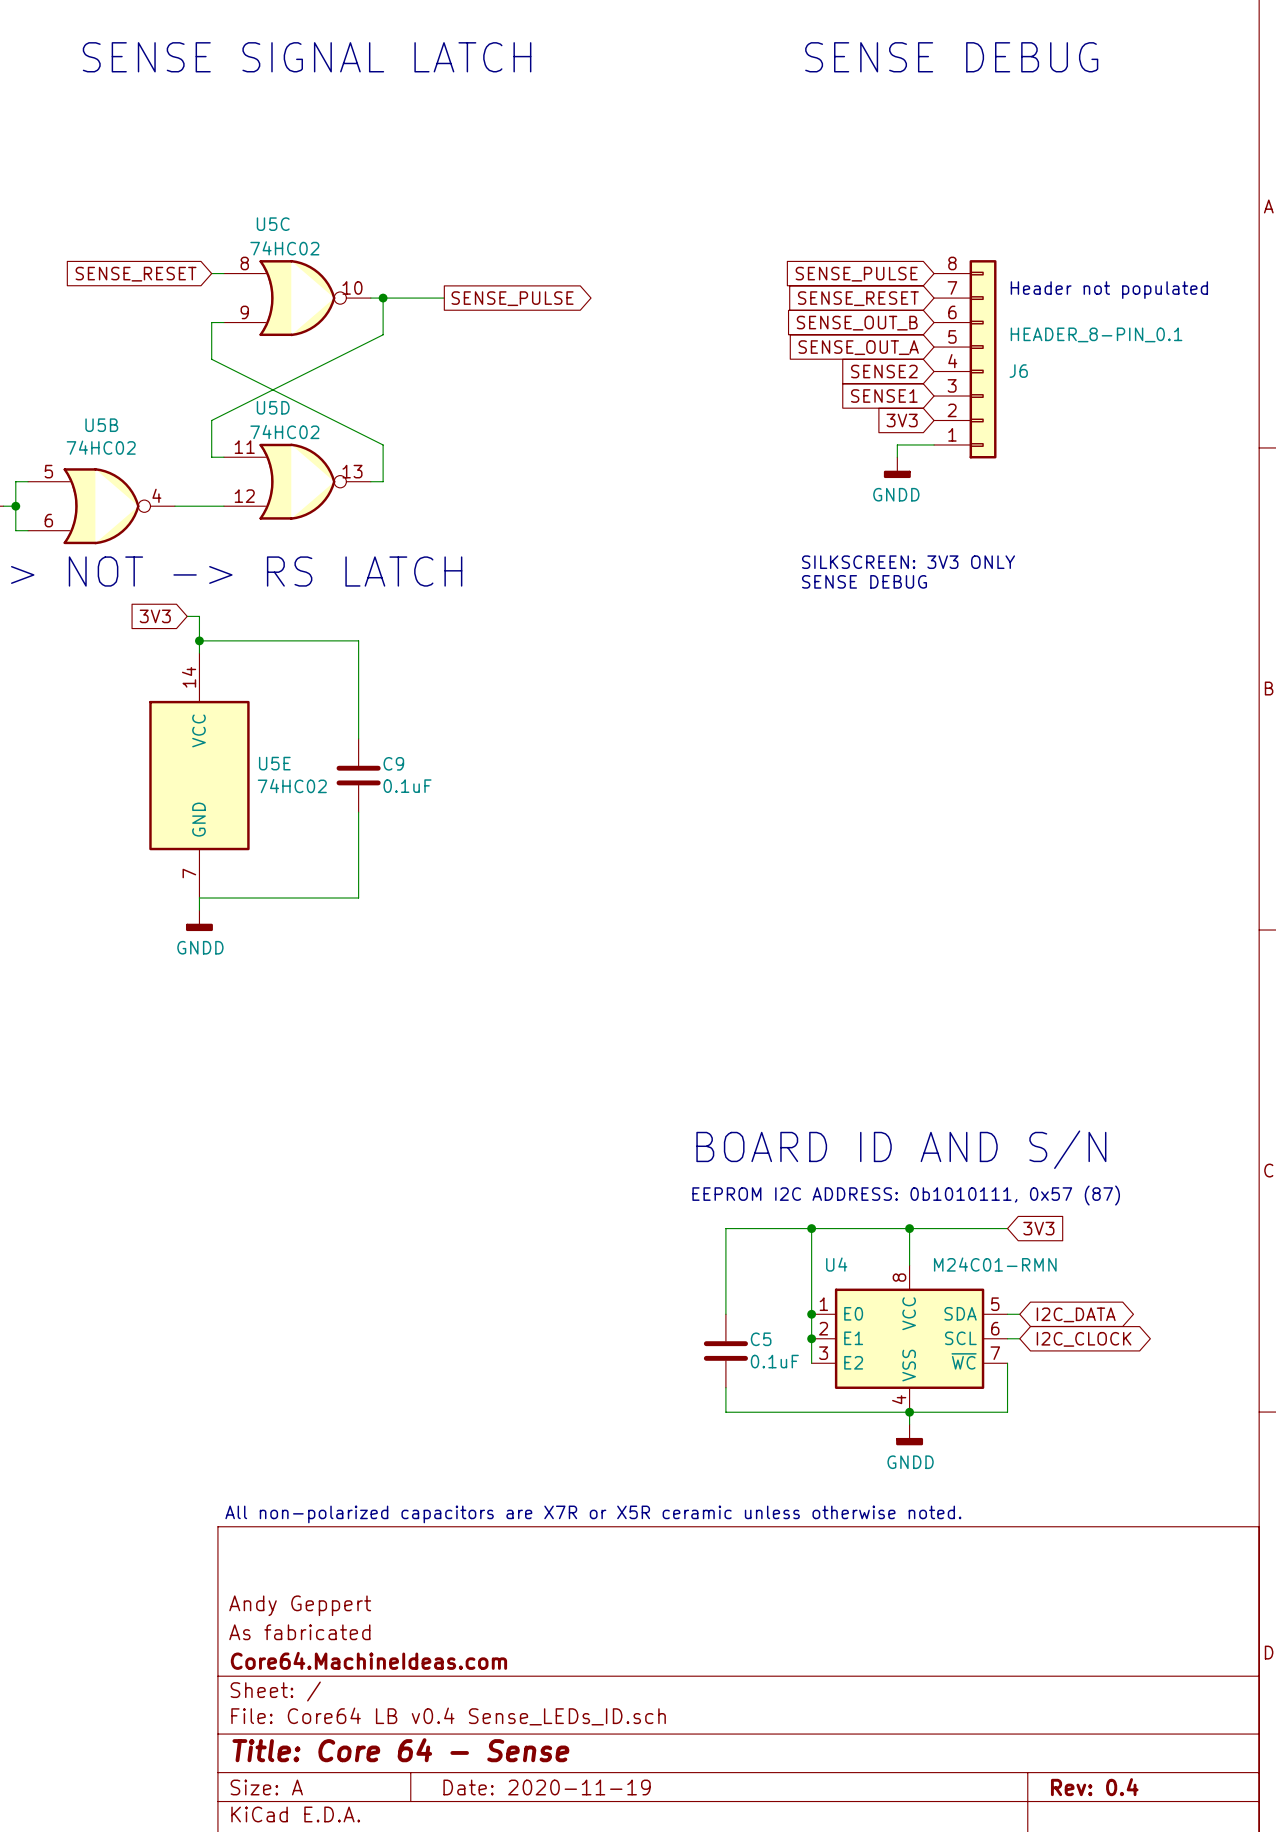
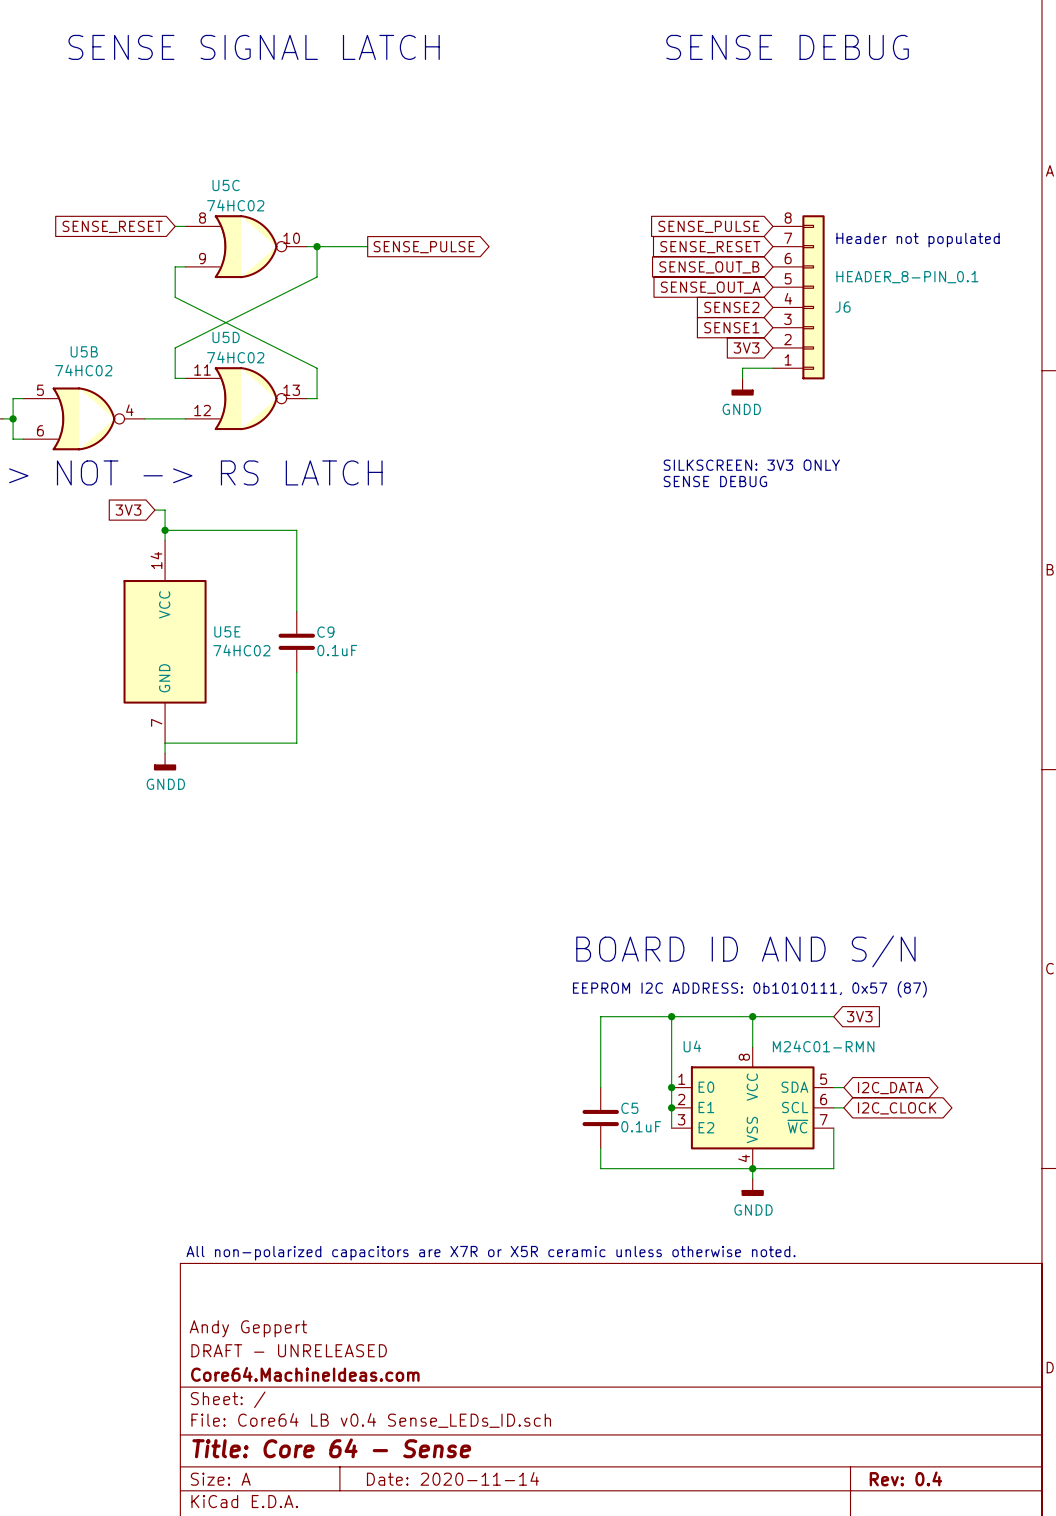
title block: As fabricated (299, 1632) -> DRAFT - UNRELEASED (289, 1350)
title block: Date: 2020-11-19 (547, 1787) -> Date: 2020-11-14 (452, 1478)

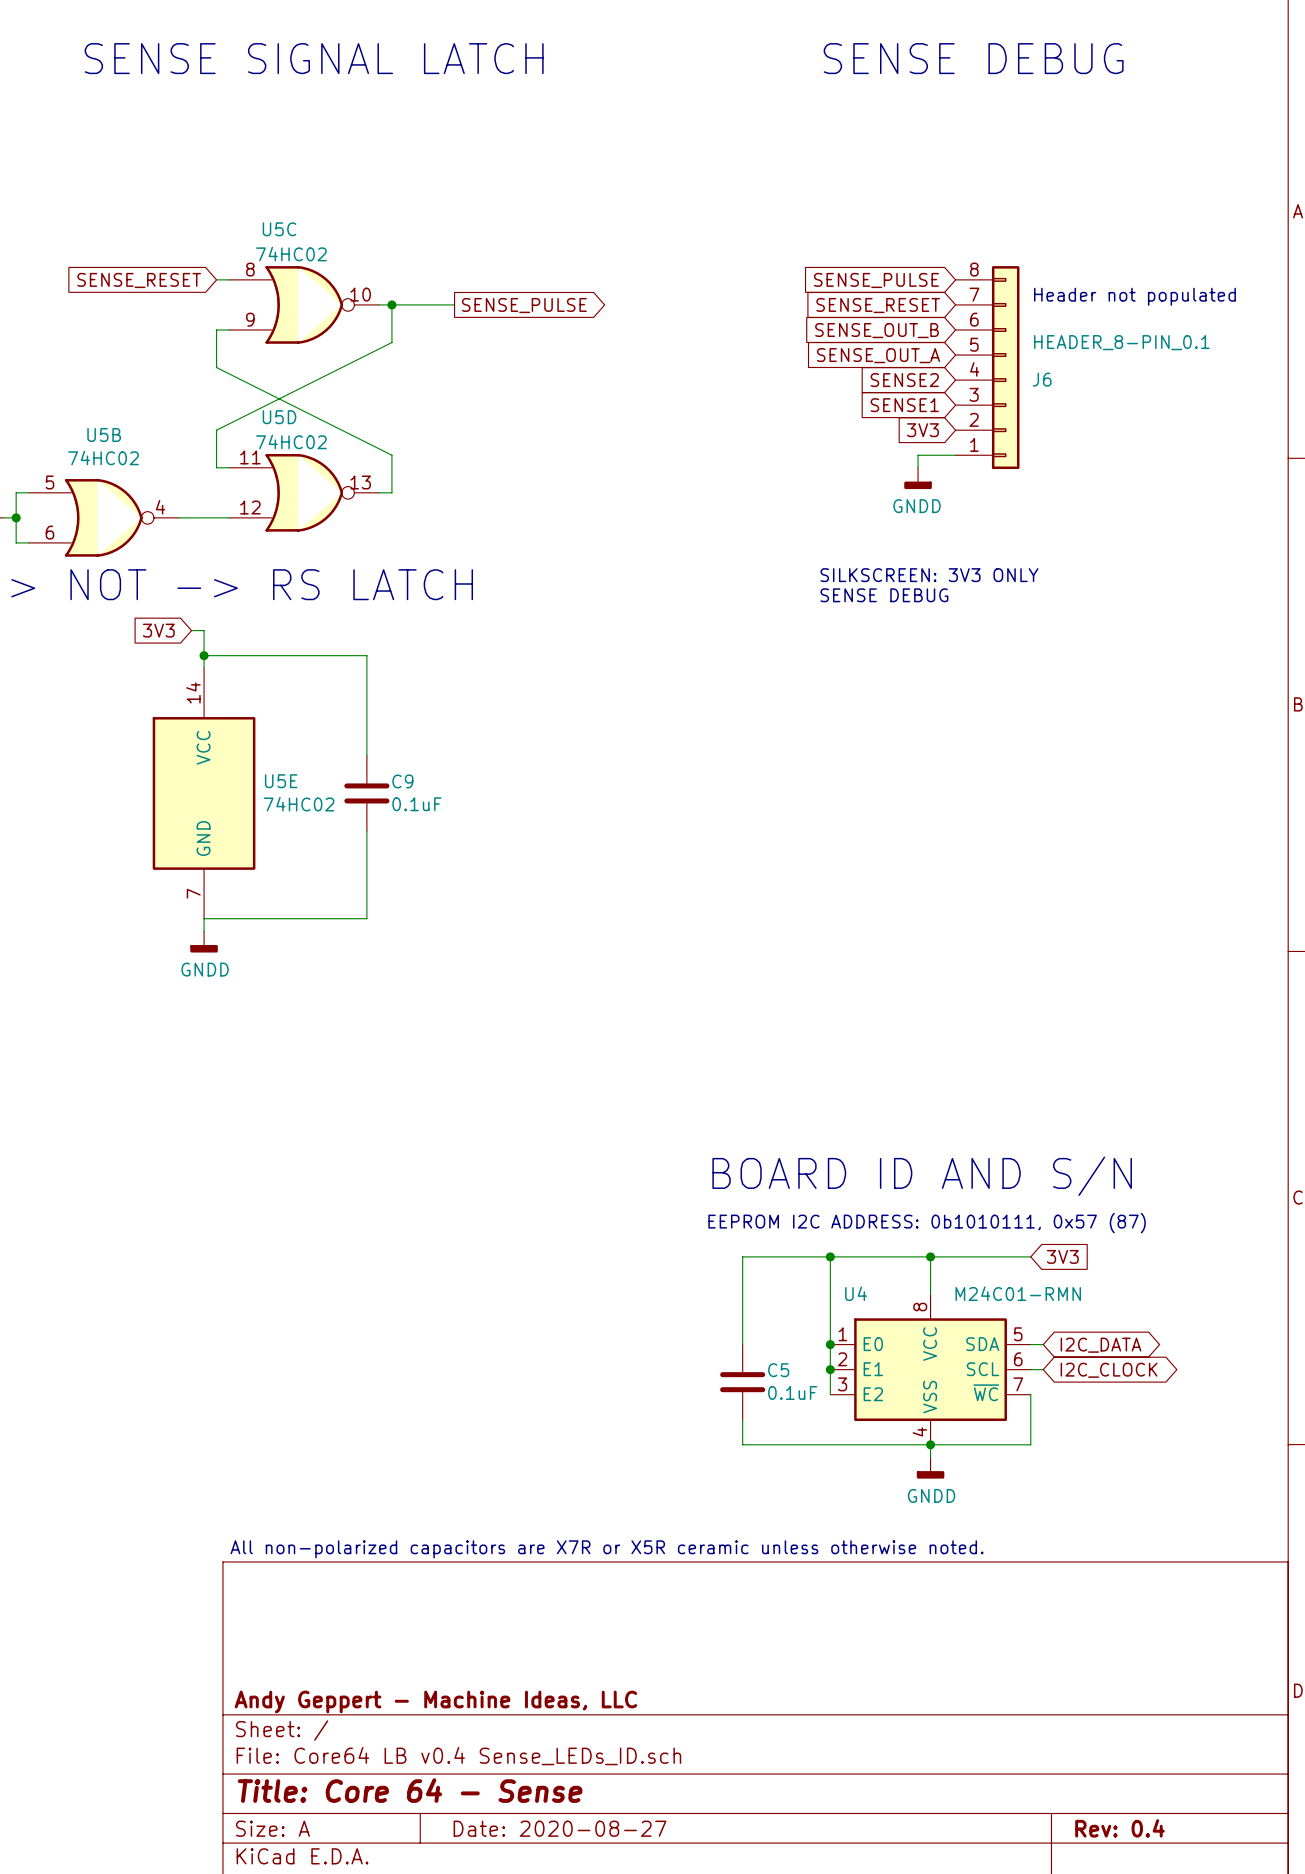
title block: Andy Geppert (248, 1328) -> none
title block: DRAFT - UNRELEASED (289, 1350) -> none
title block: Core64.MachineIdeas.com (305, 1374) -> Andy Geppert - Machine Ideas, LLC (435, 1701)
title block: Date: 2020-11-14 (452, 1478) -> Date: 2020-08-27 (560, 1828)

